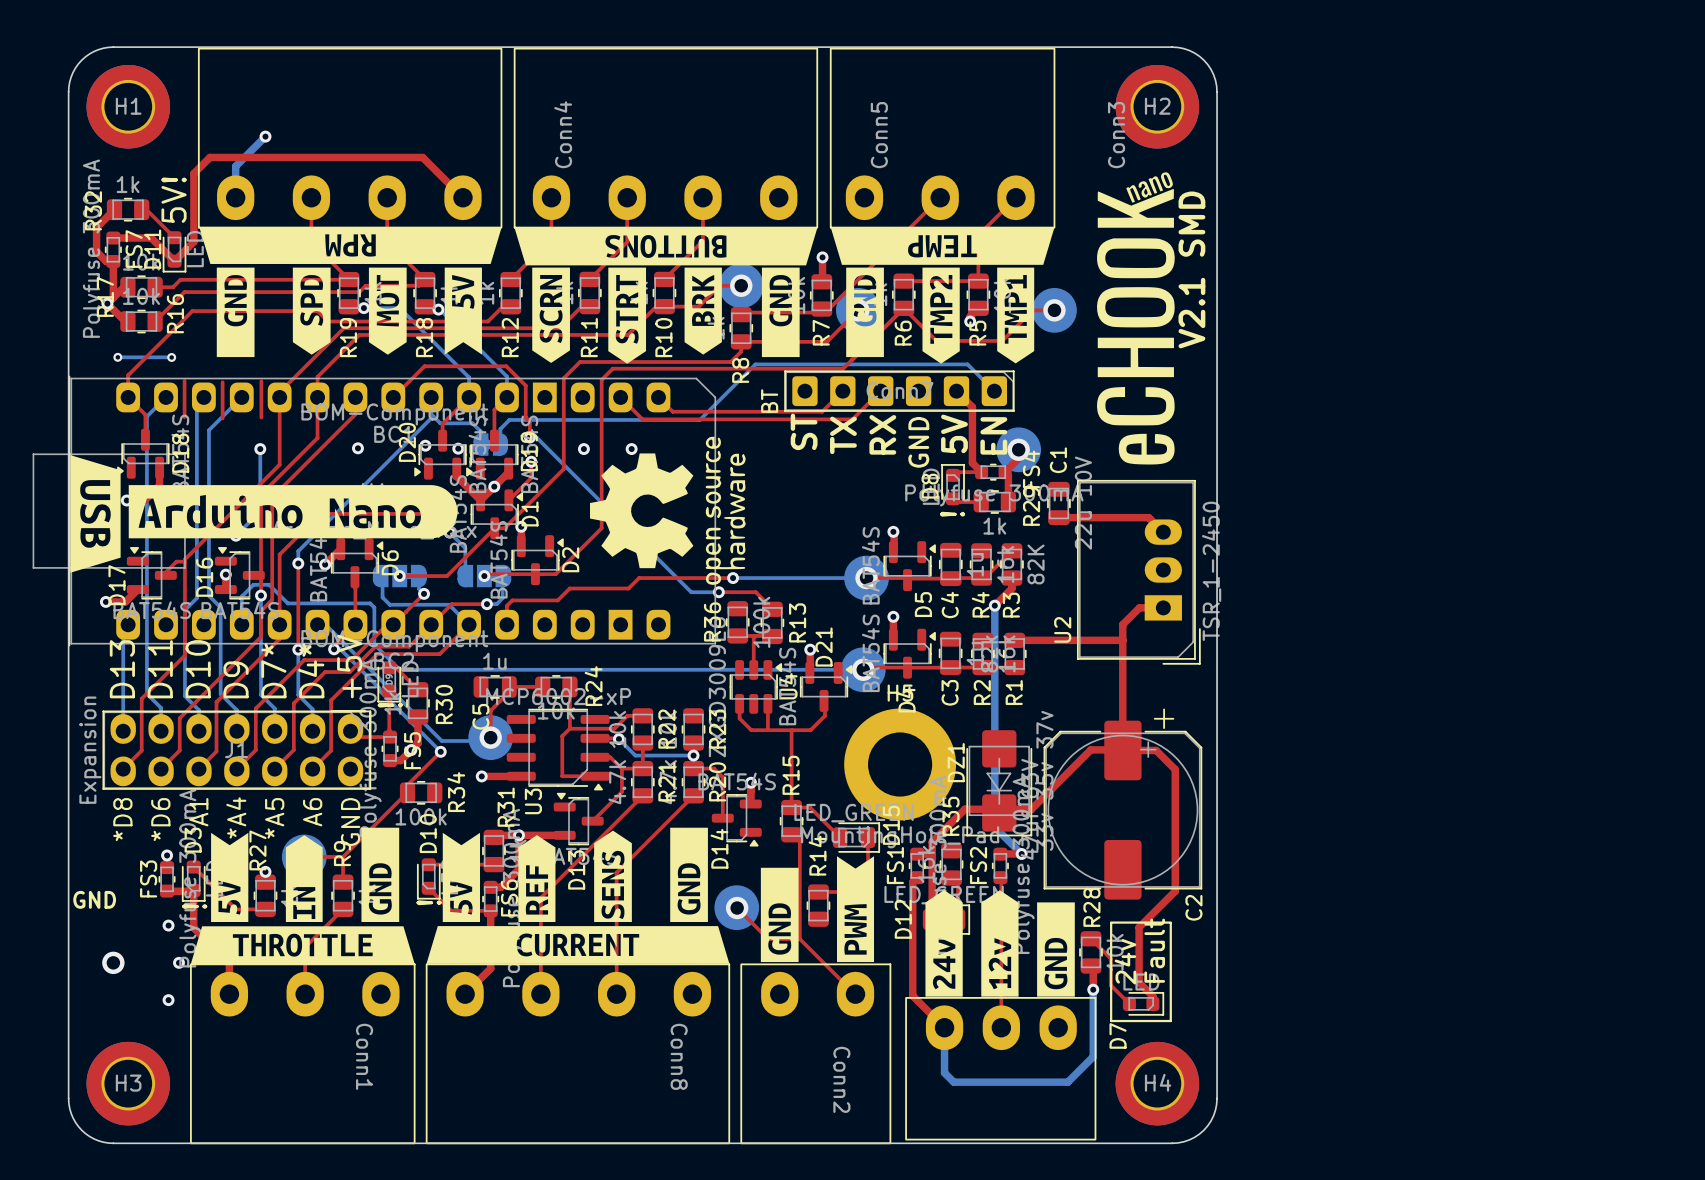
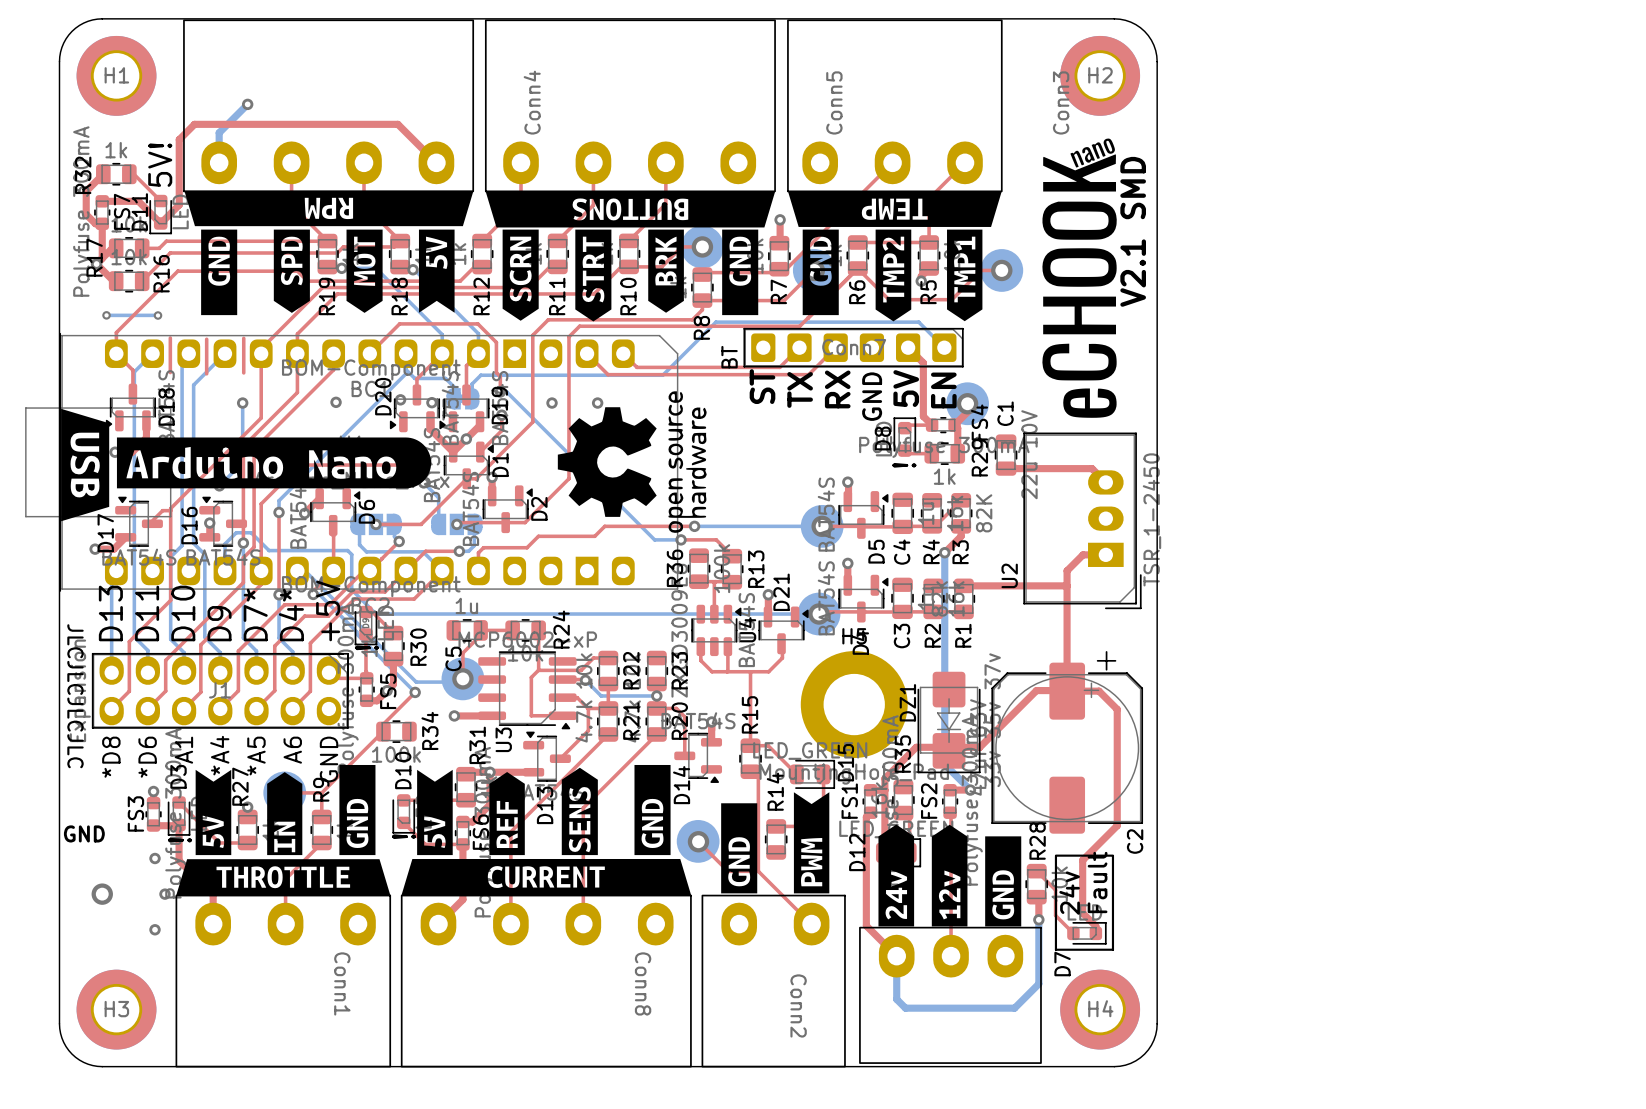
text: none -> JLCJLCJLCJLC (75, 696)

